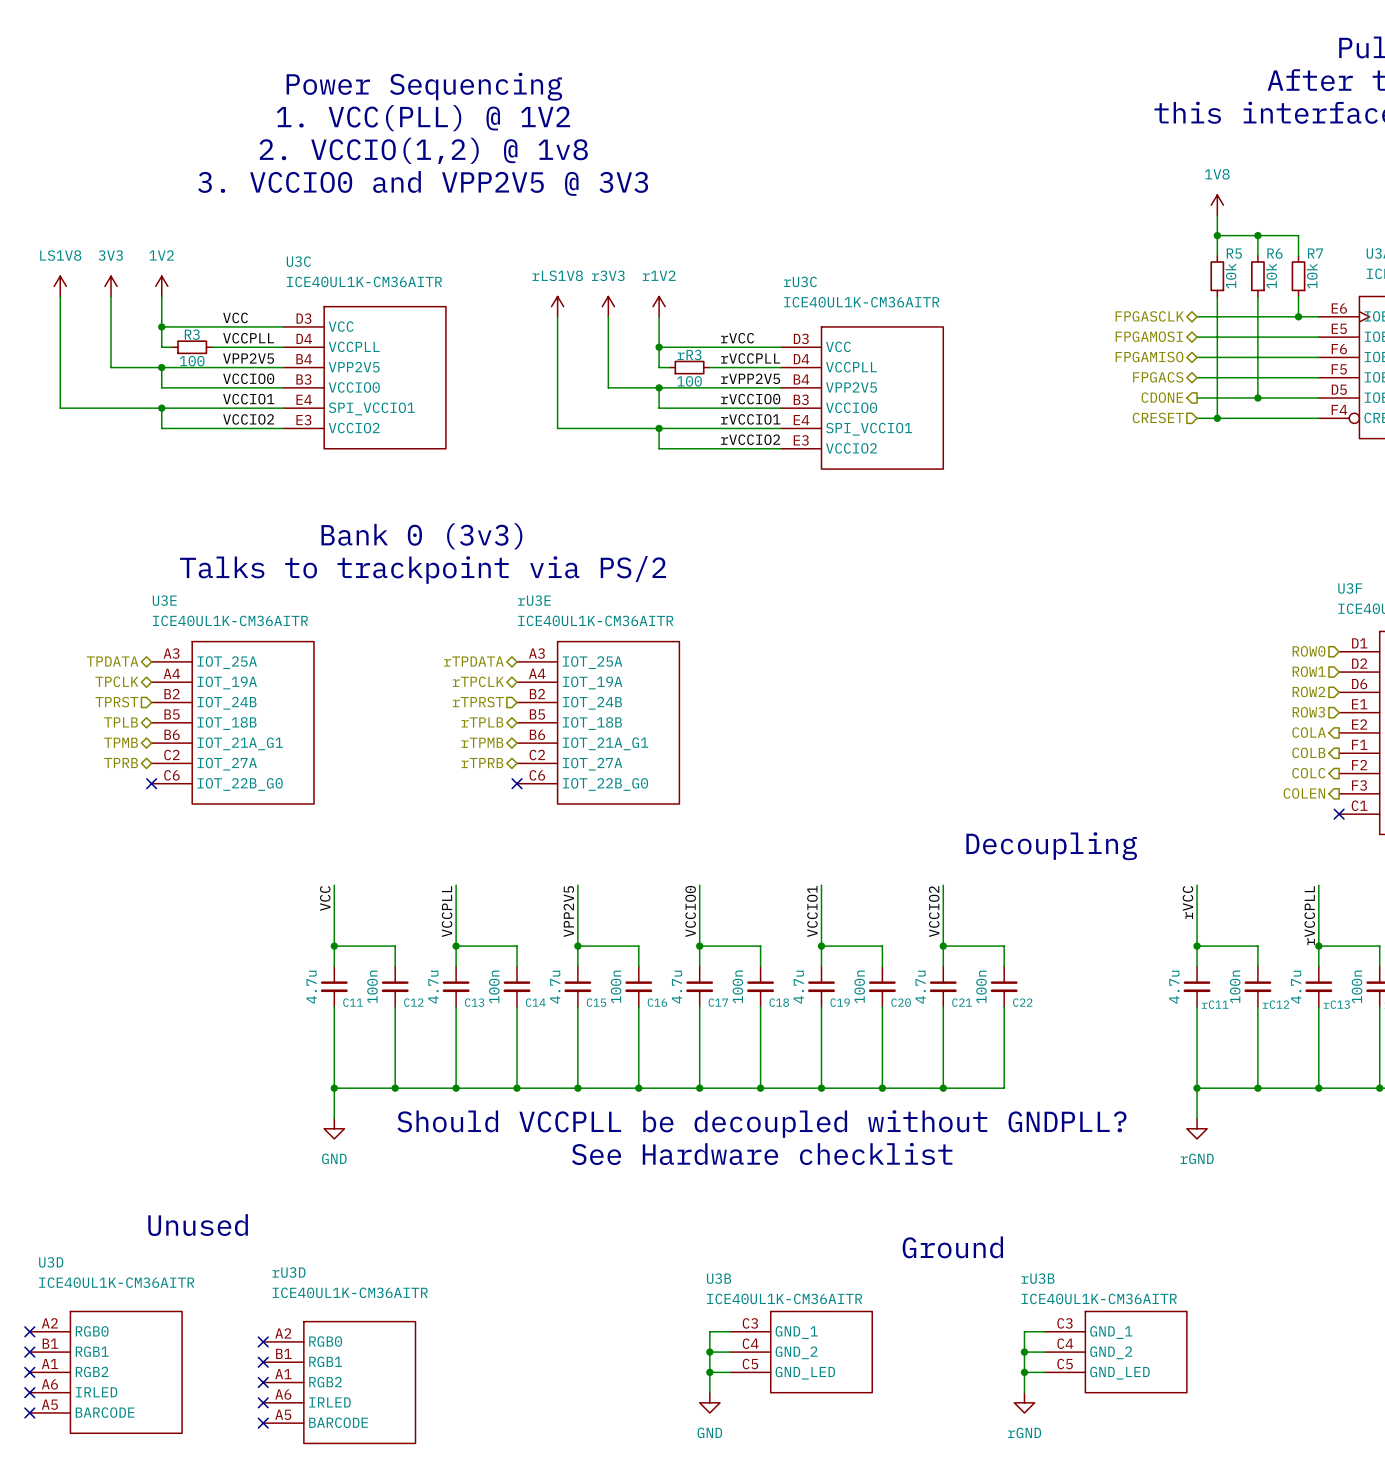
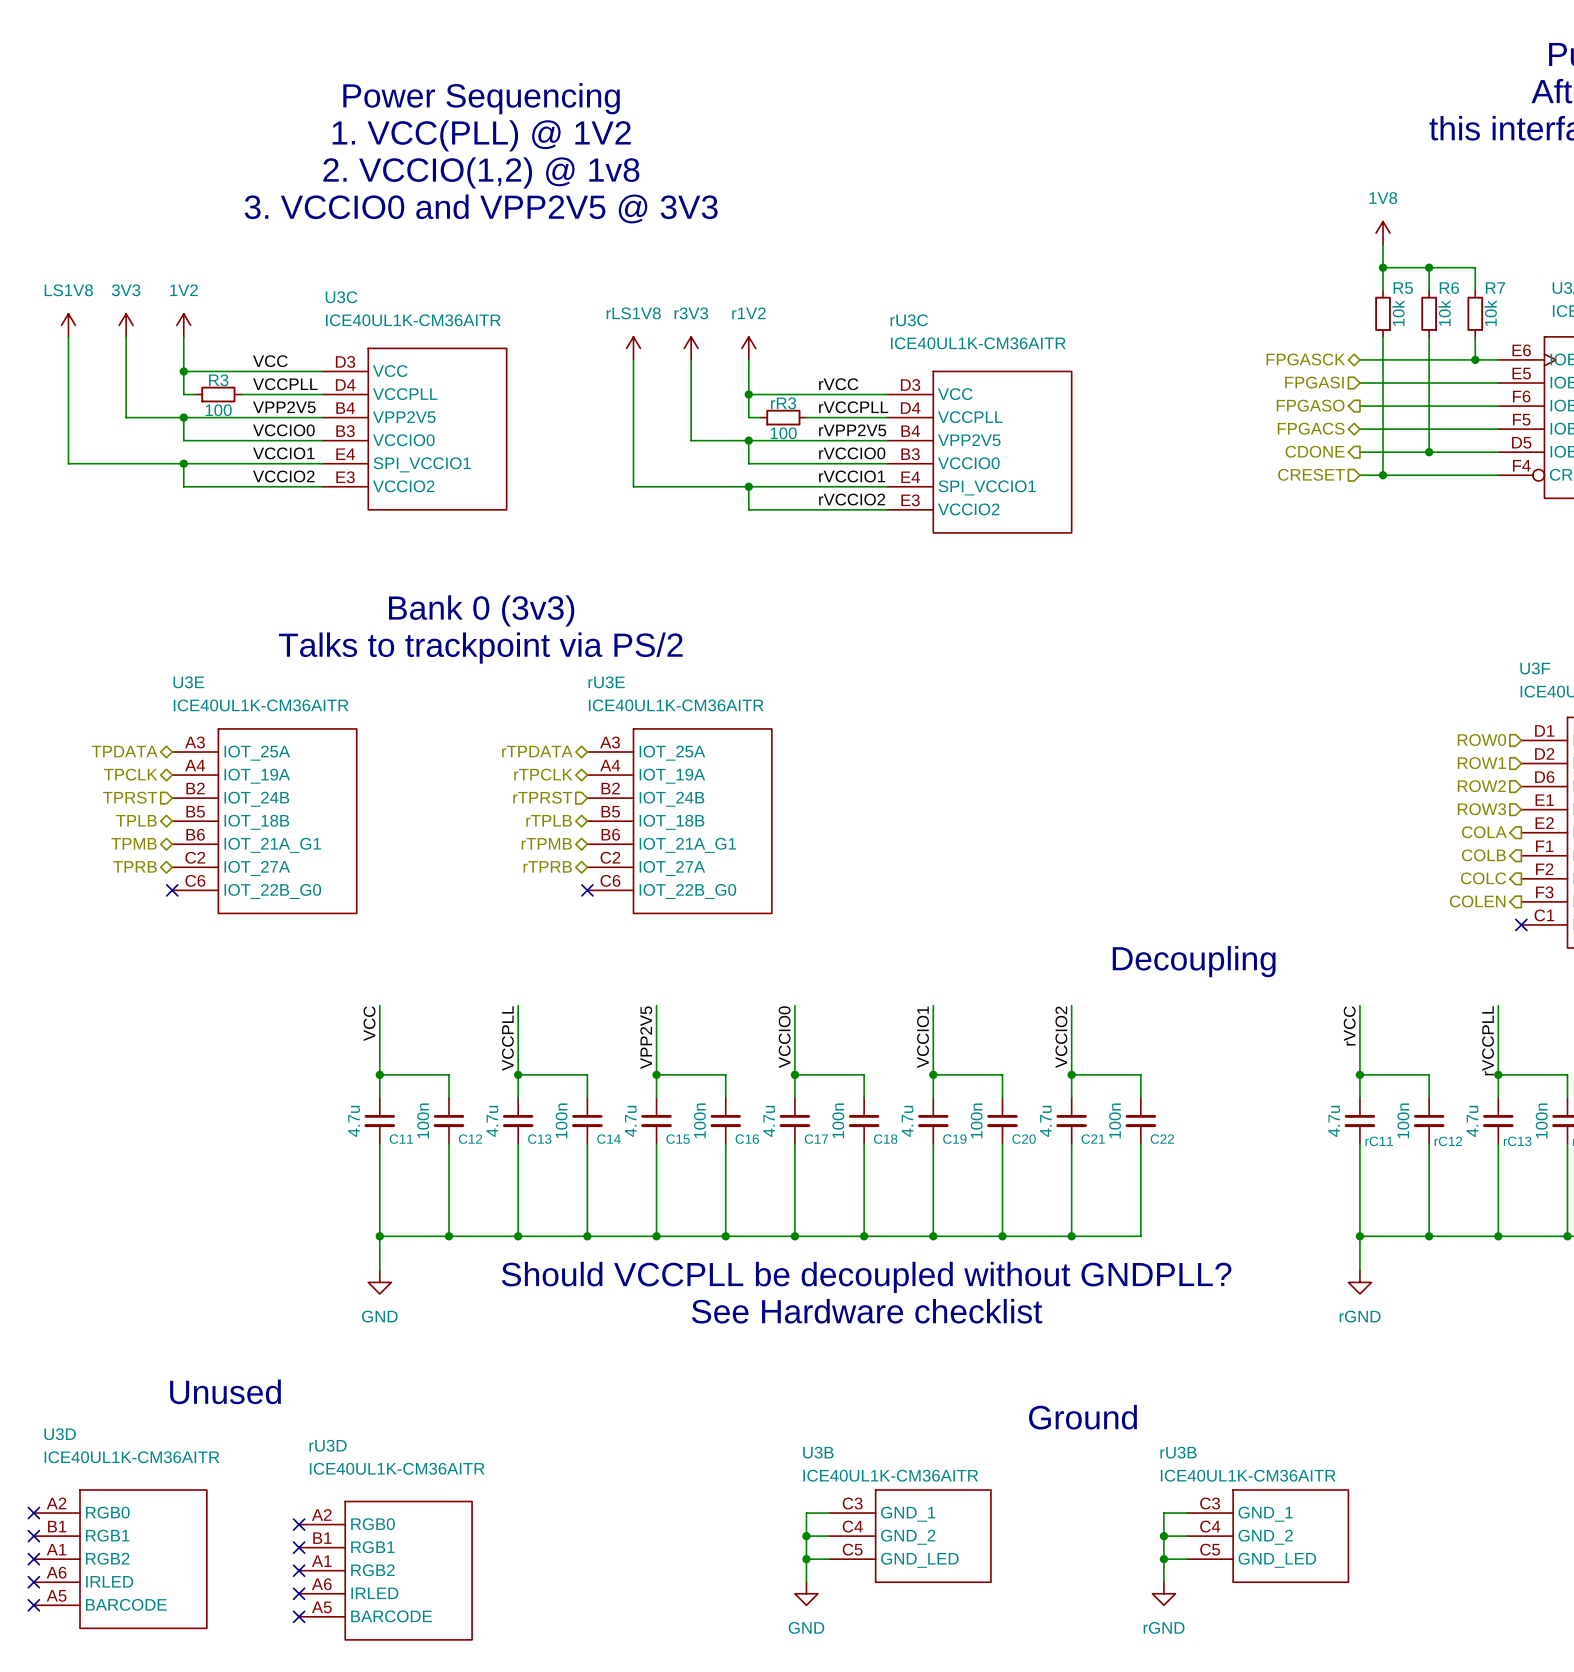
hierarchical label: FPGASCLK (1149, 316) -> FPGASCK (1305, 359)
hierarchical label shape: bidirectional (1149, 336) -> input (1314, 382)
hierarchical label: FPGAMOSI (1149, 336) -> FPGASI (1314, 382)
hierarchical label shape: bidirectional (1149, 357) -> output (1310, 405)
hierarchical label: FPGAMISO (1149, 357) -> FPGASO (1310, 405)

